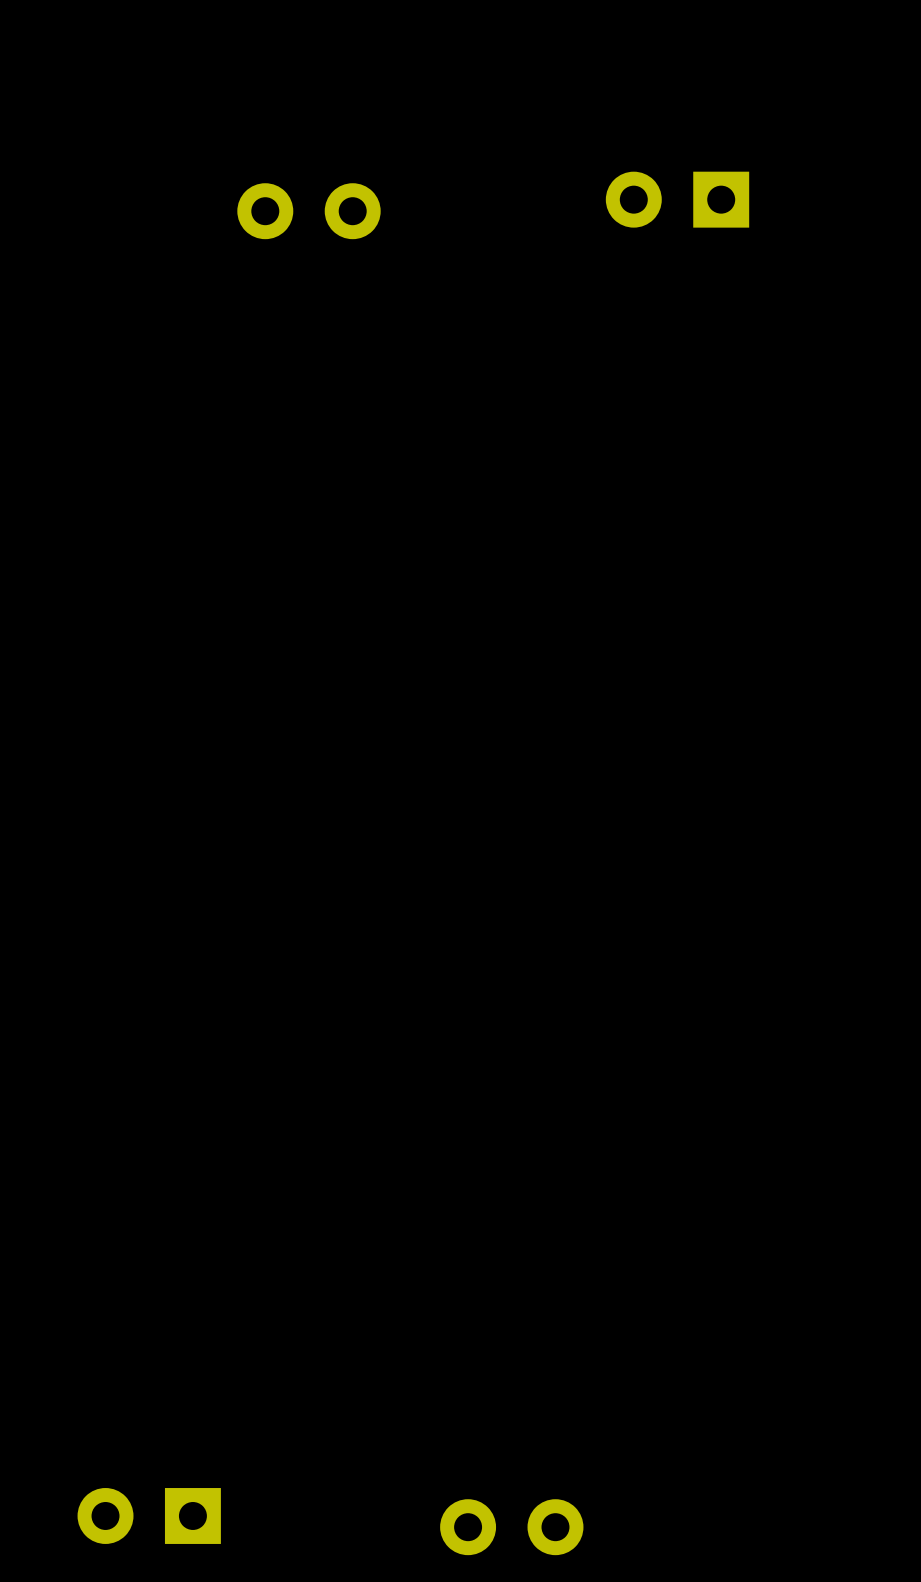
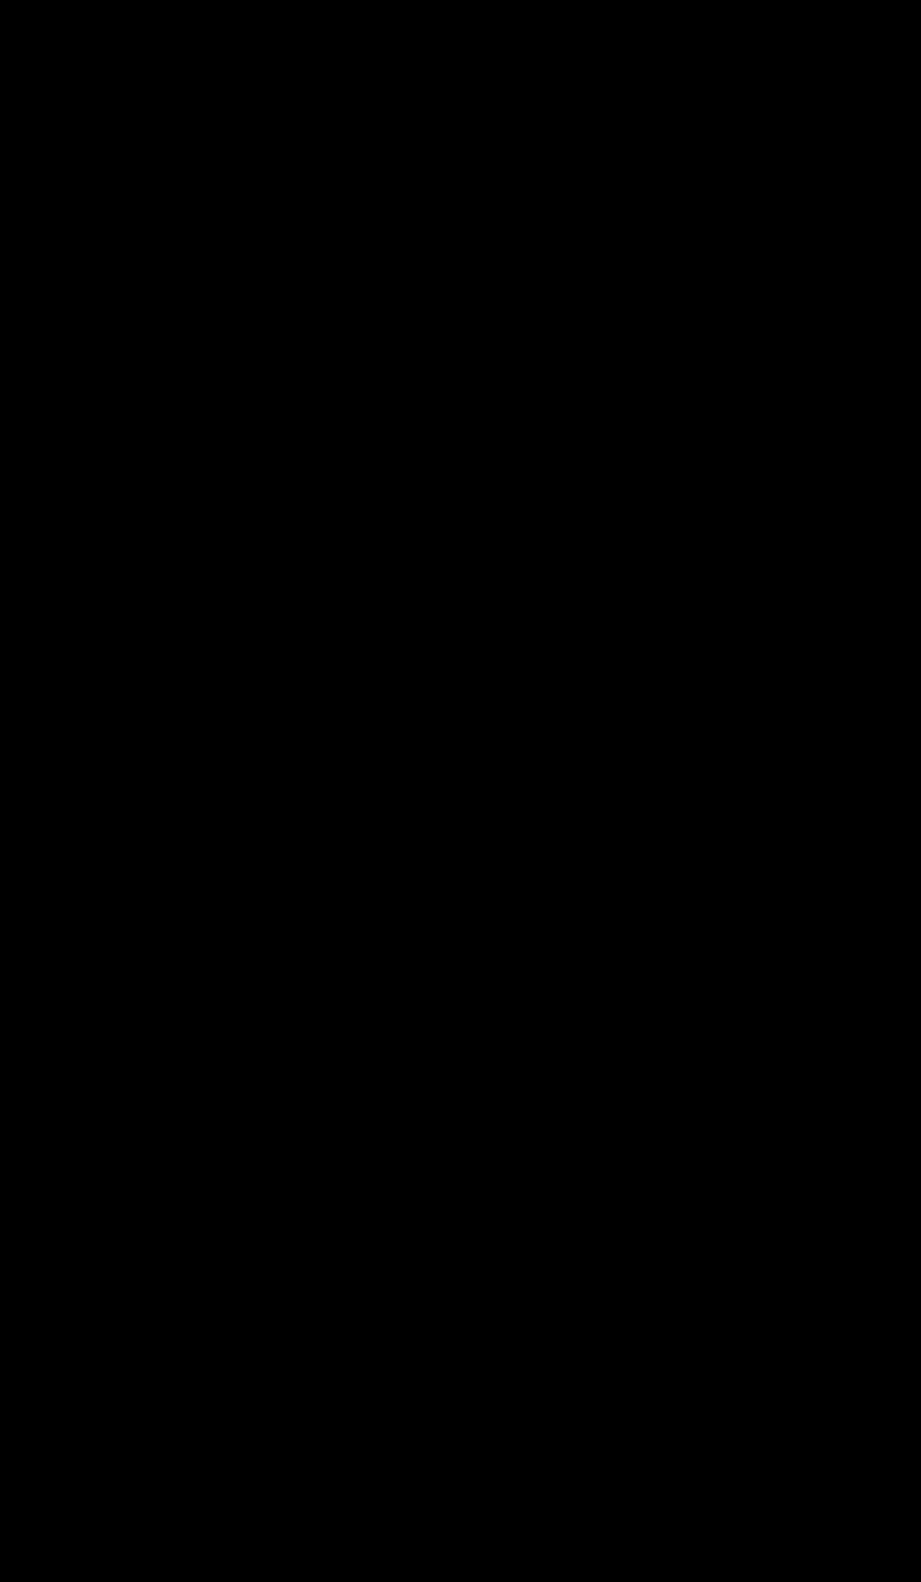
part: (677, 199) -> none
part: (309, 211) -> none
part: (149, 1515) -> none
part: (511, 1527) -> none

